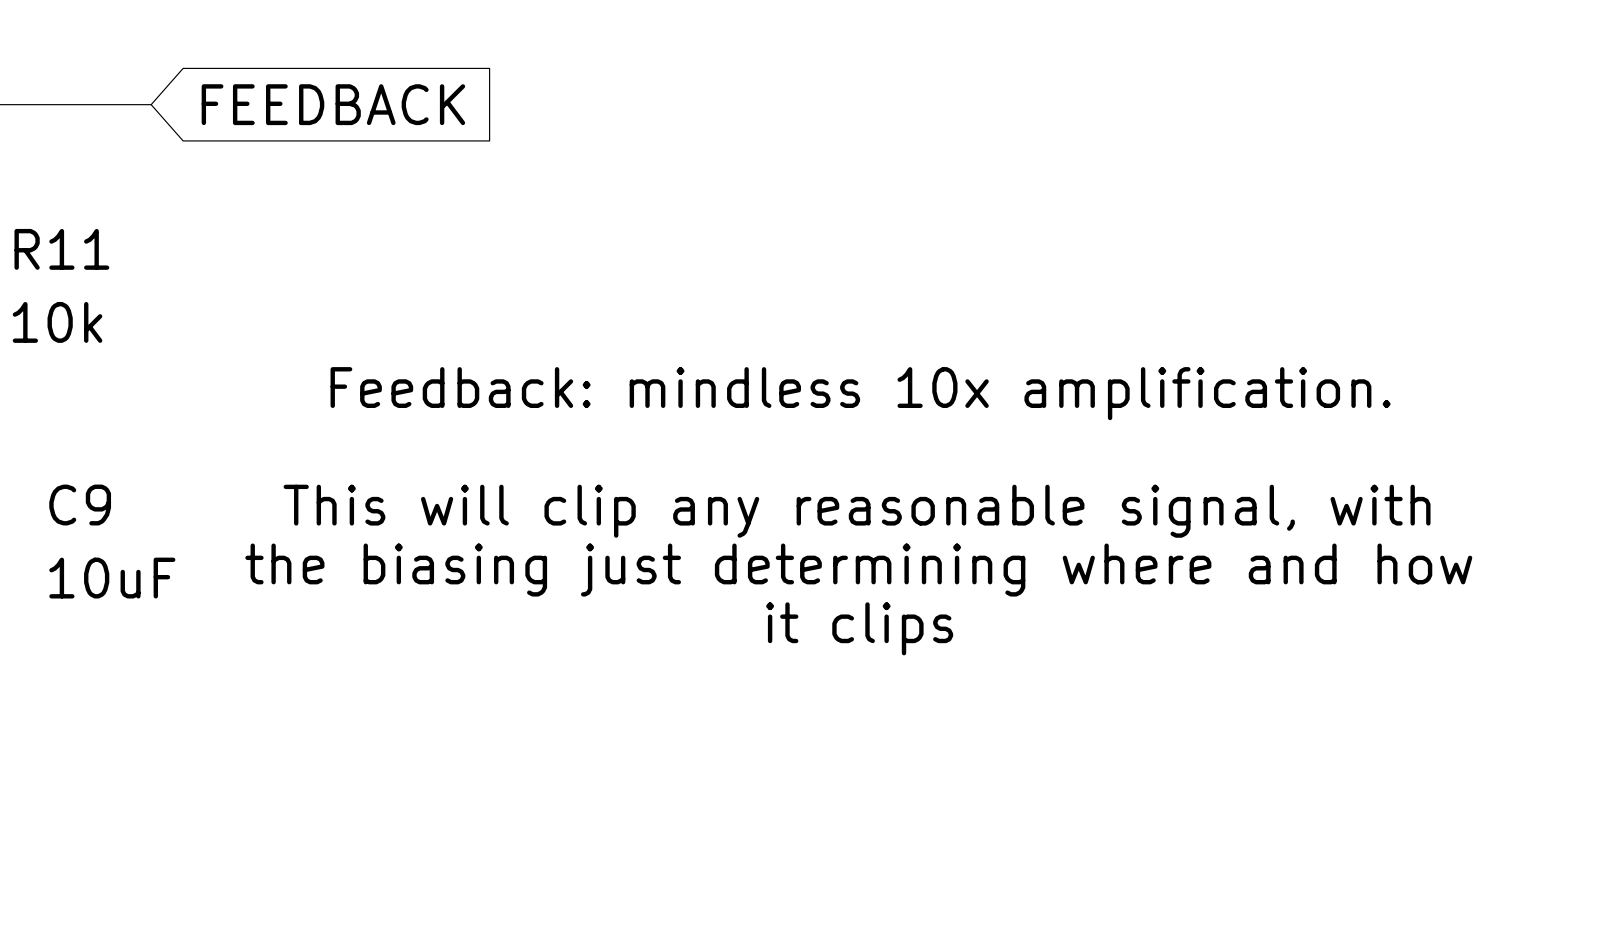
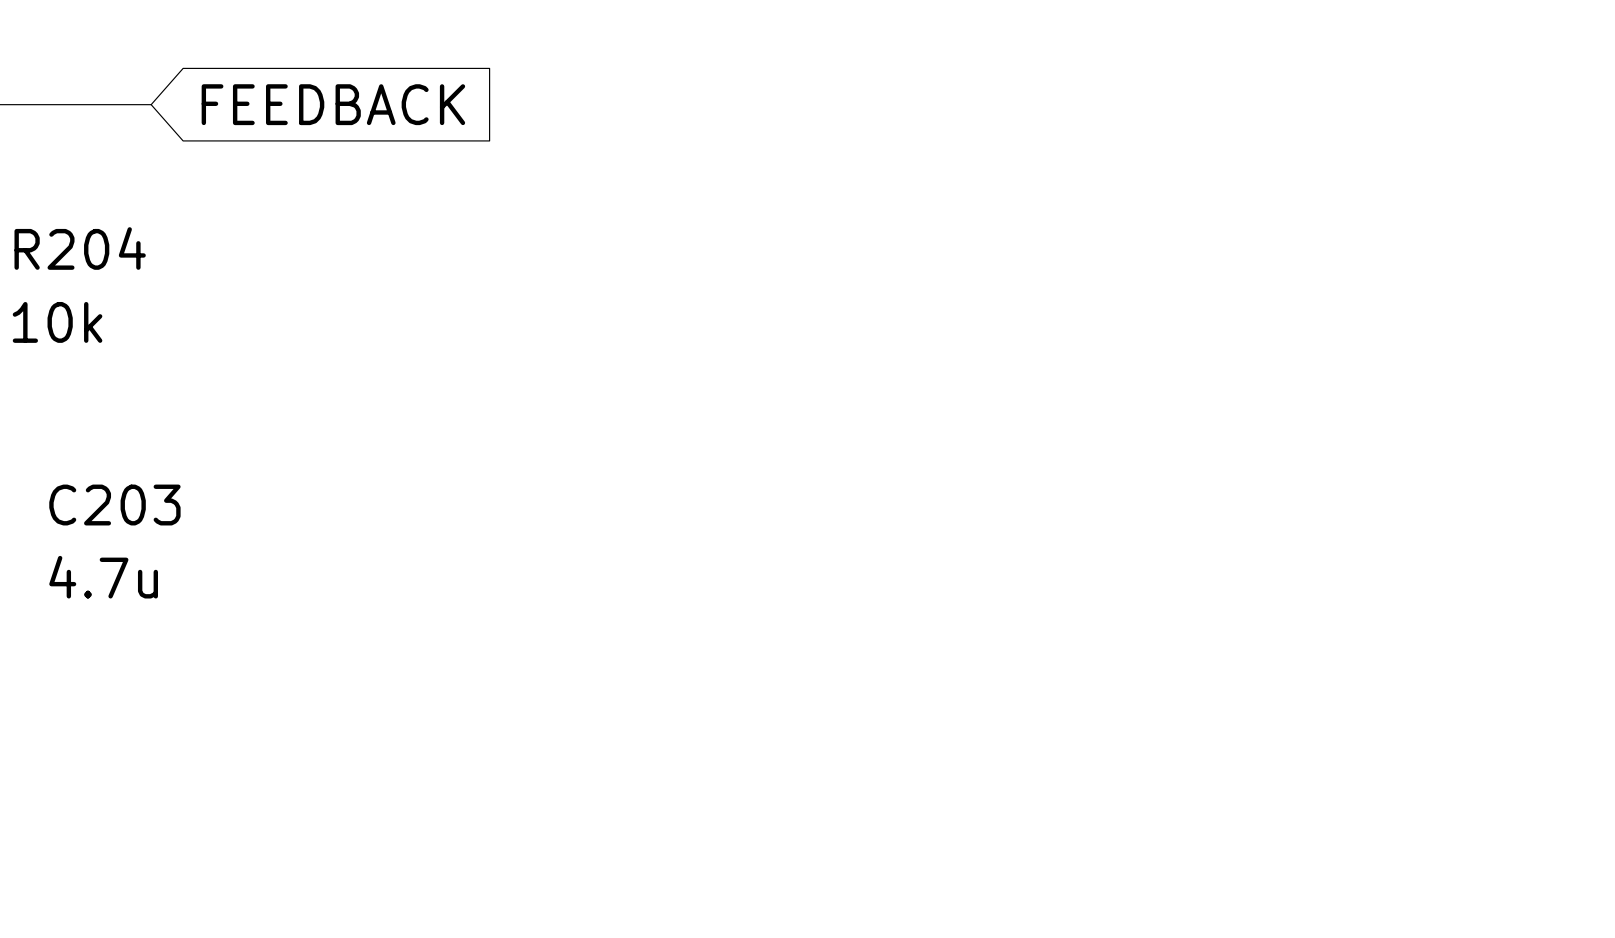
R11 name: R11 (61, 249) -> R204 (80, 248)
text: Feedback: mindless 10x amplification. (860, 393) -> none
C9 name: C9 (80, 505) -> C203 (114, 505)
text: This will clip any reasonable signal, with (857, 511) -> none
text: the biasing just determining where and how (858, 570) -> none
C9 value: 10uF (112, 578) -> 4.7u (103, 577)
text: it clips (859, 628) -> none

